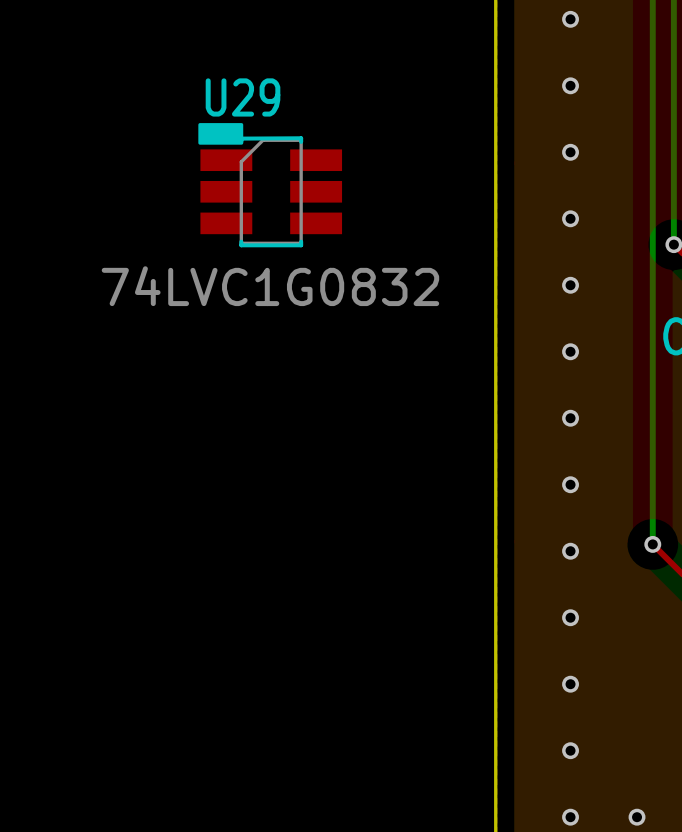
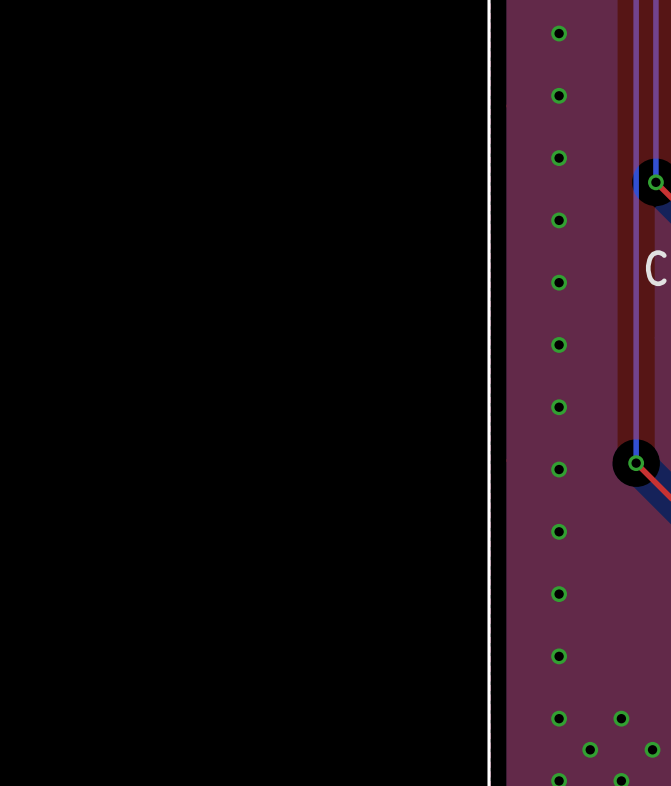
U29: 74LVC1G0832 (270, 185) -> none

